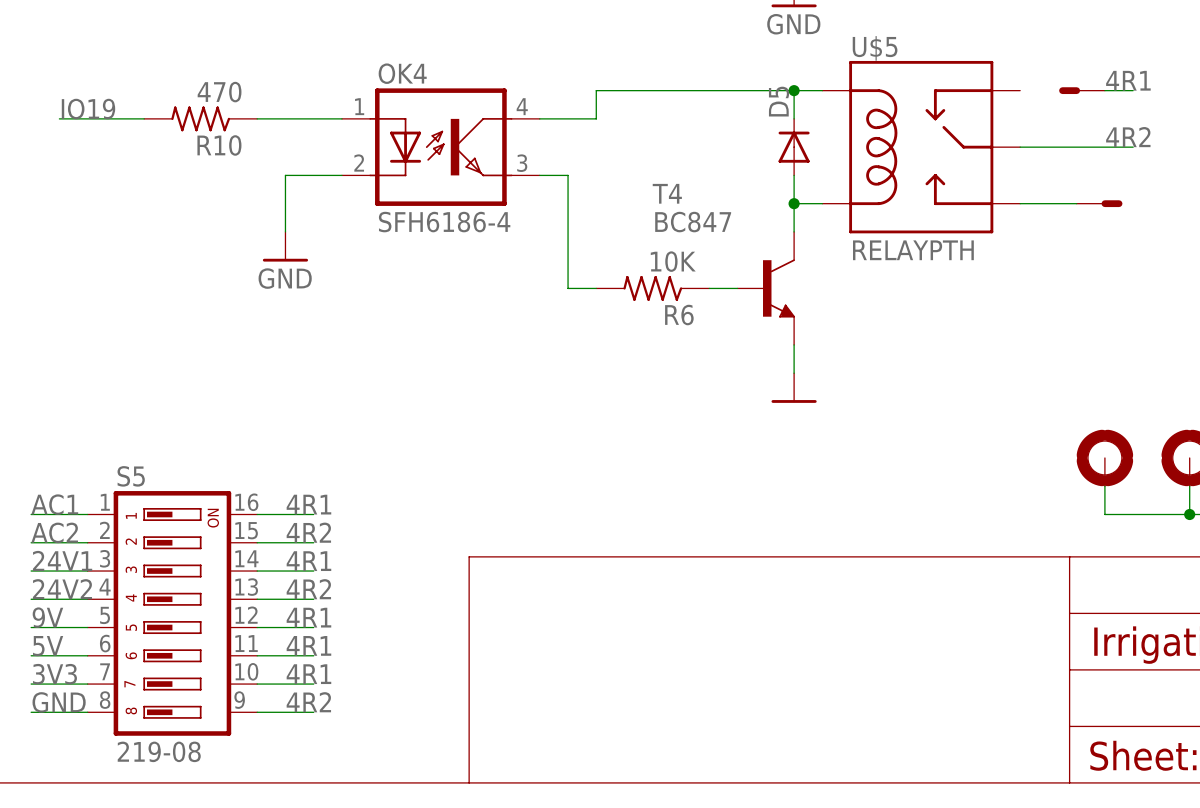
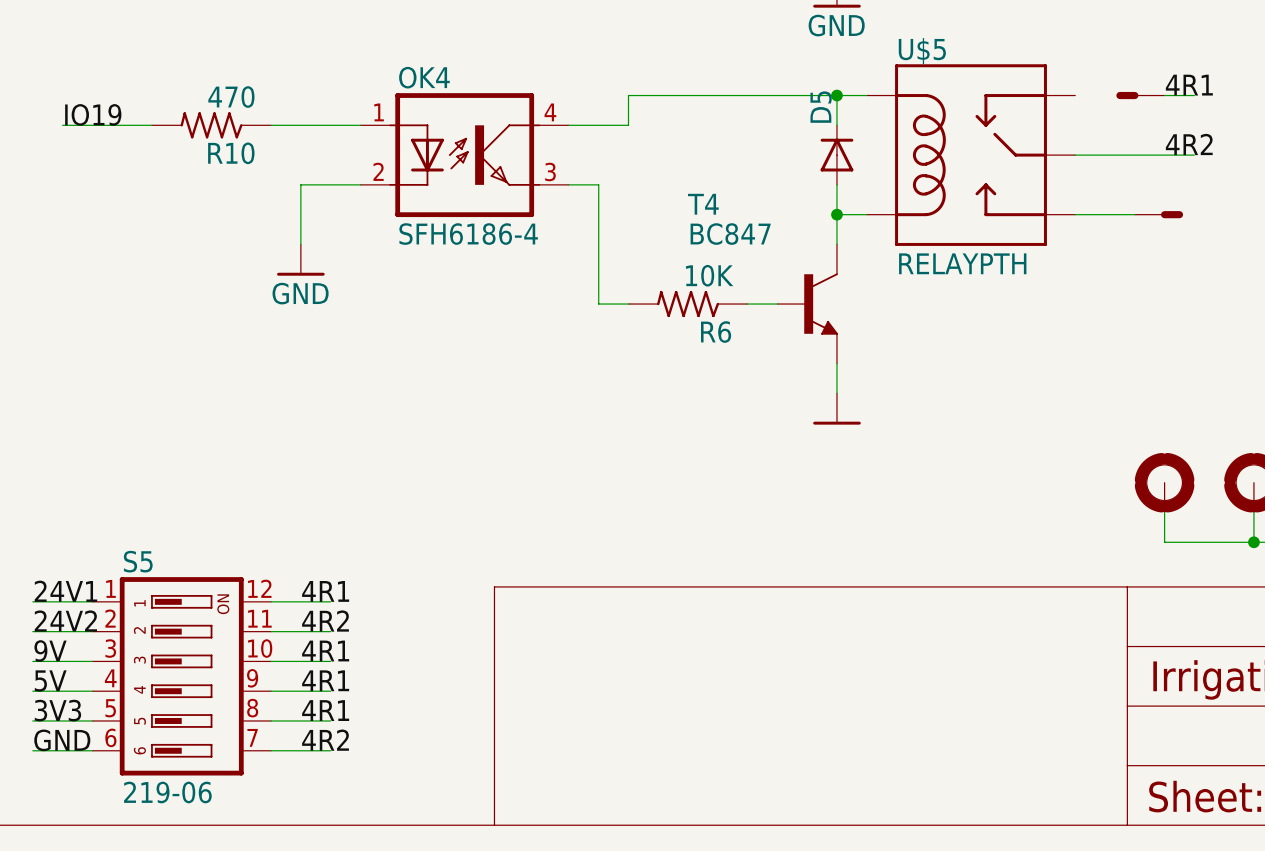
S5 name position: S5 (131, 476) -> S5 (138, 561)
S5 symbol: [87, 491, 258, 736] -> [92, 577, 272, 776]
label: AC1 (54, 504) -> none
label: 4R1 (308, 504) -> none
wire: (31, 514) (87, 514) -> none
wire: (257, 514) (313, 514) -> none
label: AC2 (54, 532) -> none
label: 4R2 (308, 532) -> none
wire: (31, 542) (87, 542) -> none
wire: (257, 542) (313, 542) -> none
S5 value: 219-08 (159, 751) -> 219-06 (167, 792)

